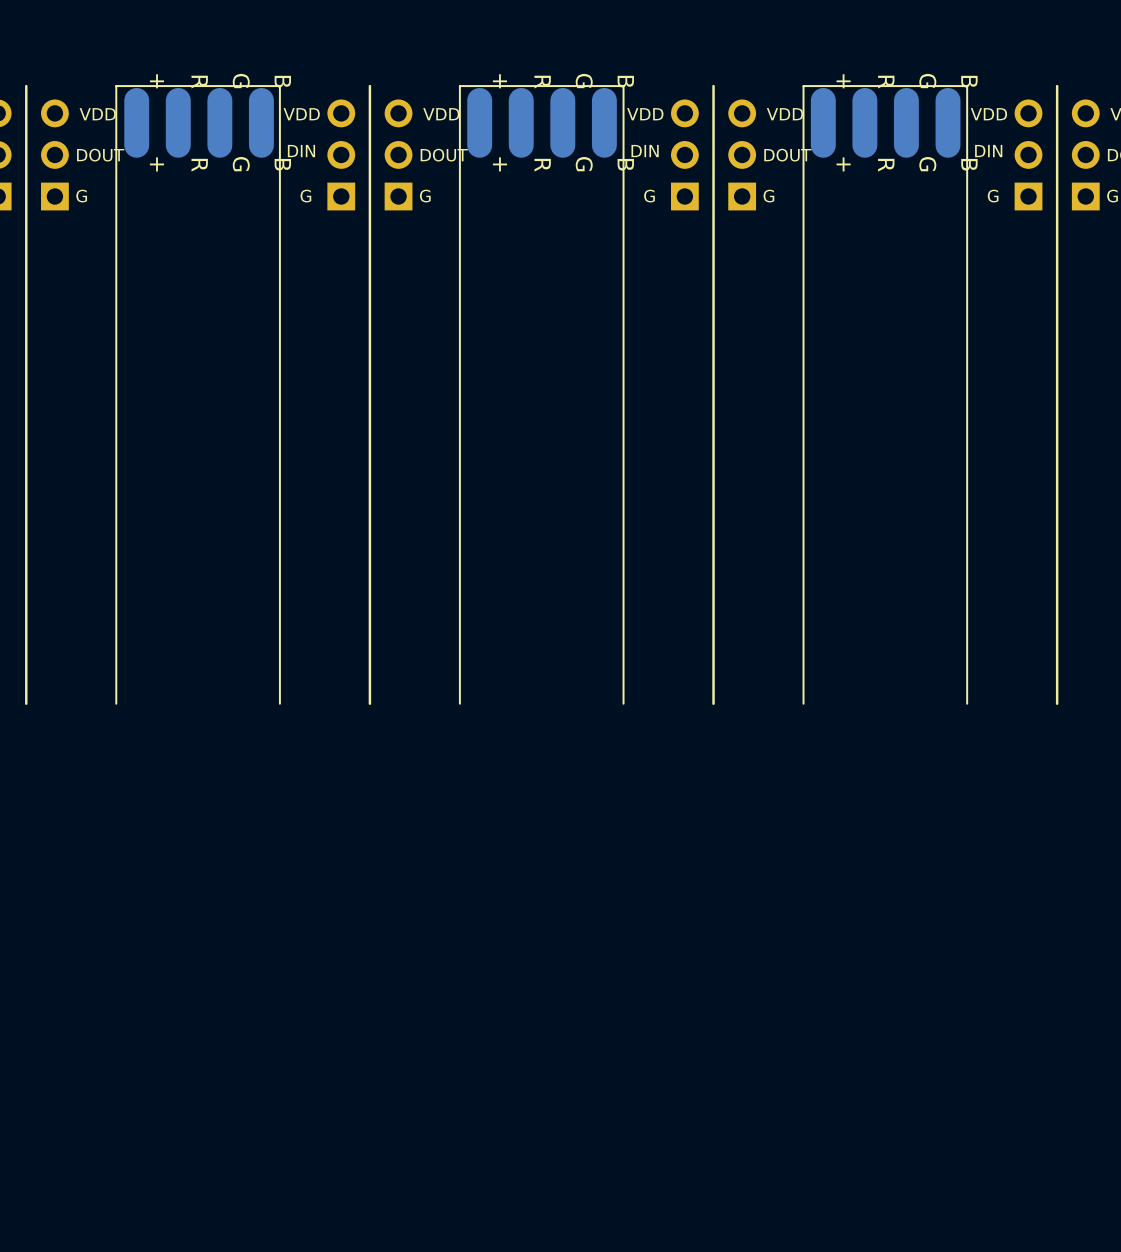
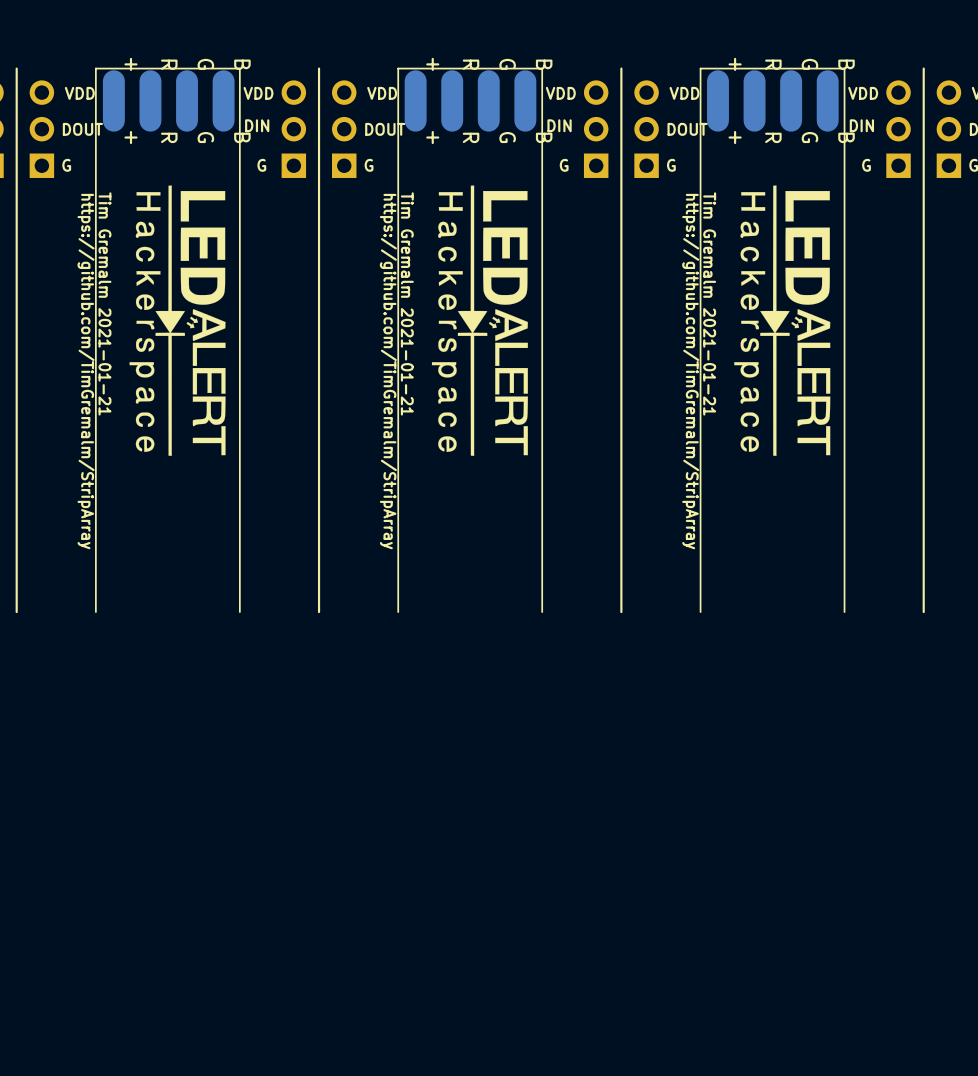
drawing: none -> [129, 185, 226, 456]
drawing: none -> [431, 185, 528, 456]
drawing: none -> [734, 185, 831, 456]
text: none -> Tim Gremalm 2021-01-21 (104, 303)
text: none -> Tim Gremalm 2021-01-21 (407, 303)
text: none -> Tim Gremalm 2021-01-21 (709, 303)
text: none -> https://github.com/TimGremalm/StripArray (86, 371)
text: none -> https://github.com/TimGremalm/StripArray (388, 371)
text: none -> https://github.com/TimGremalm/StripArray (690, 371)

